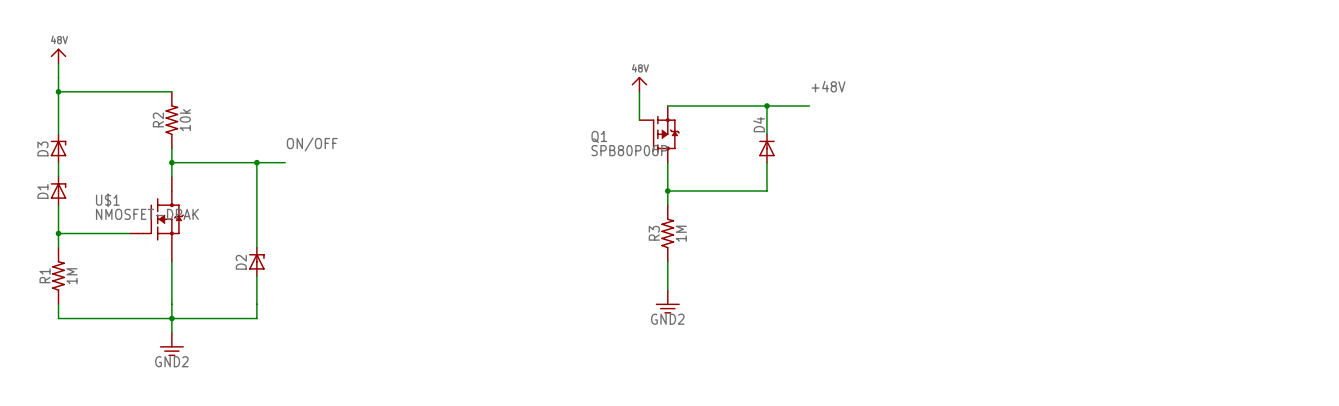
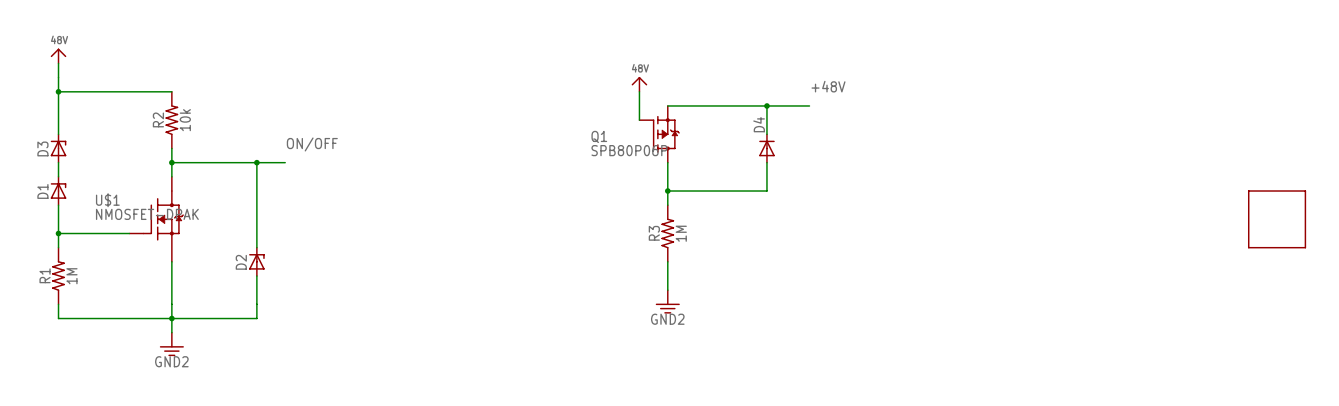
part: none -> (1277, 219)

